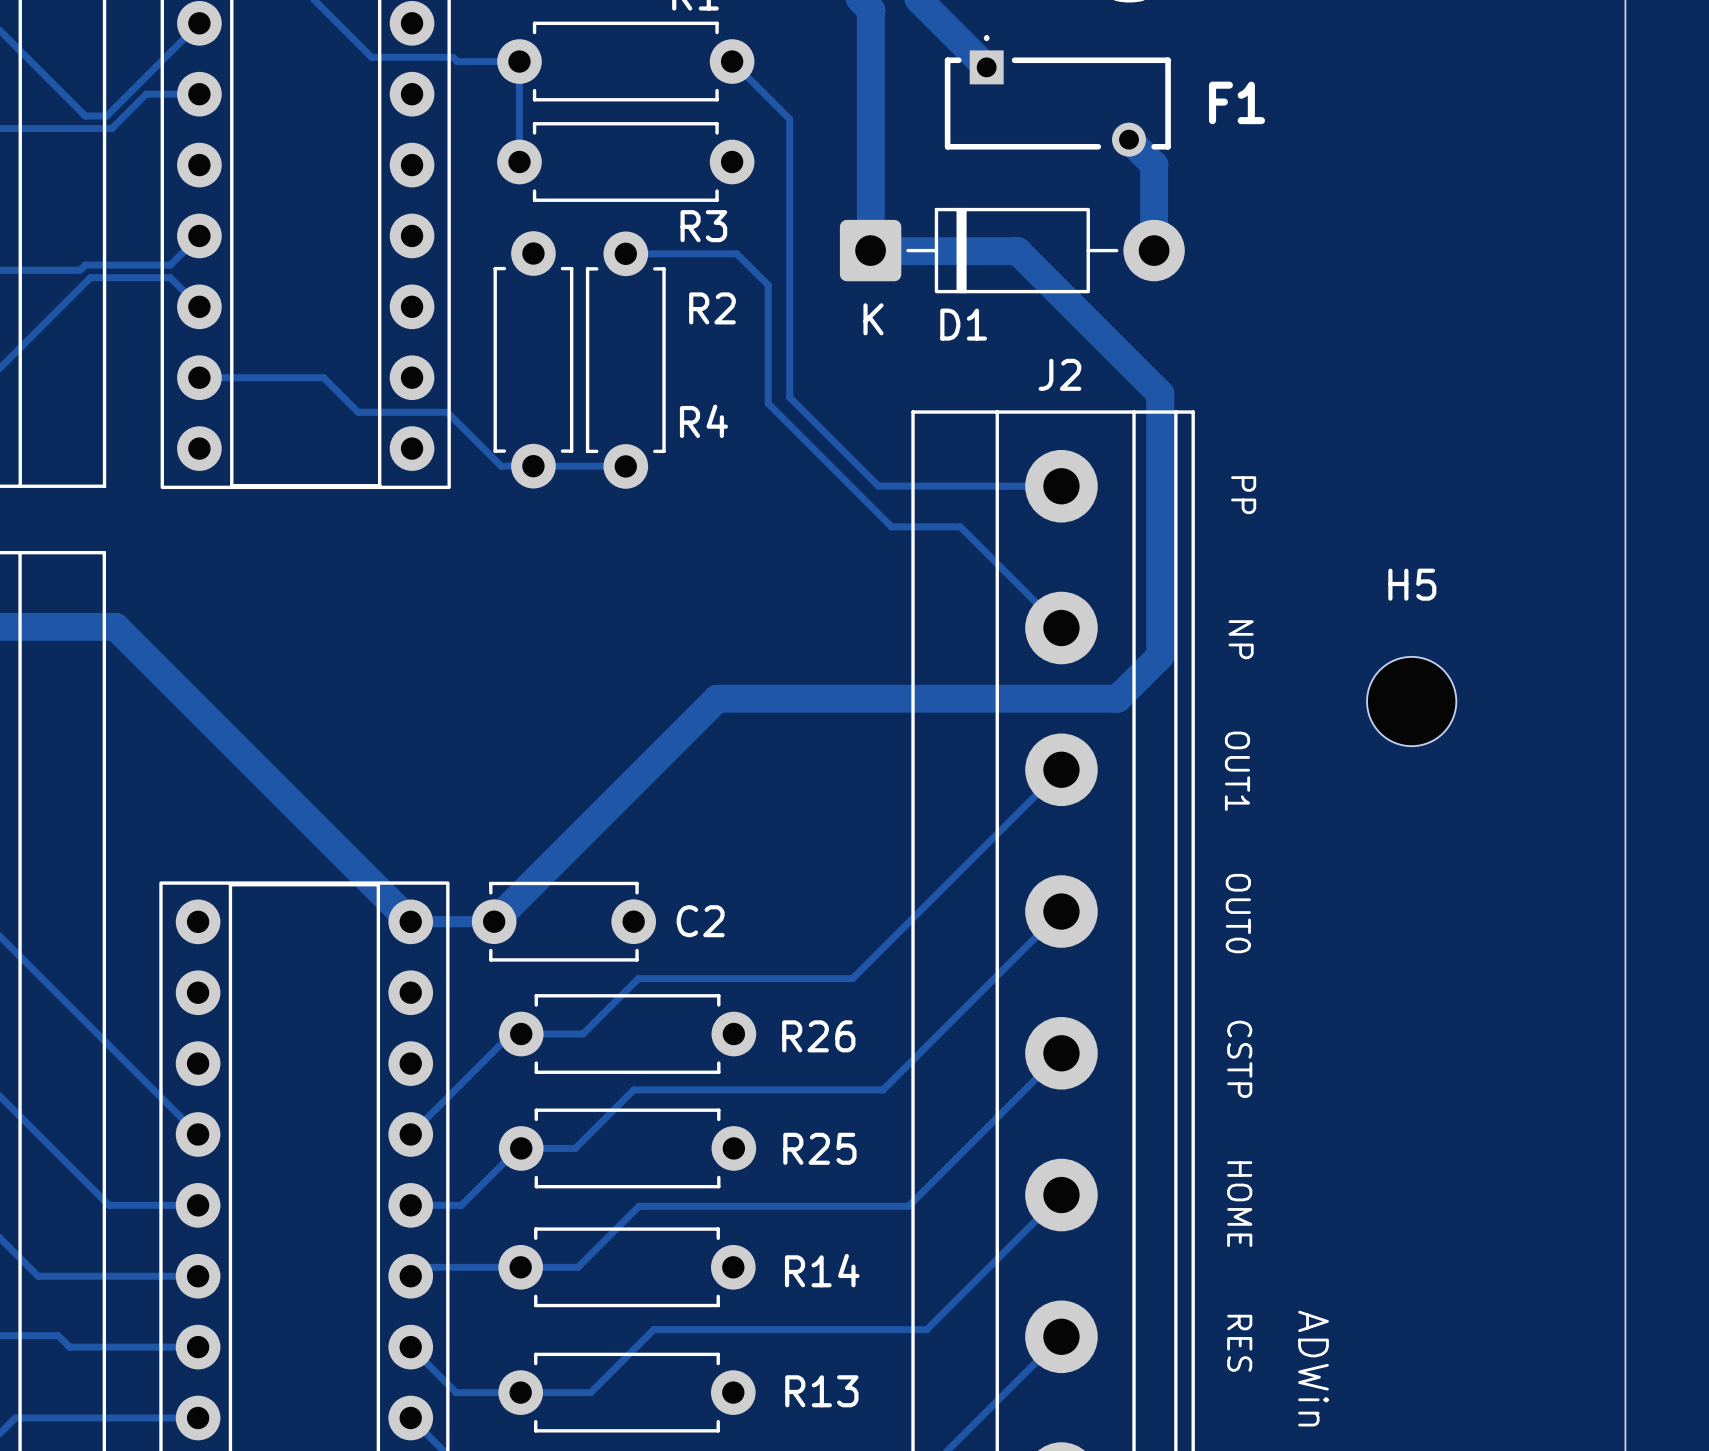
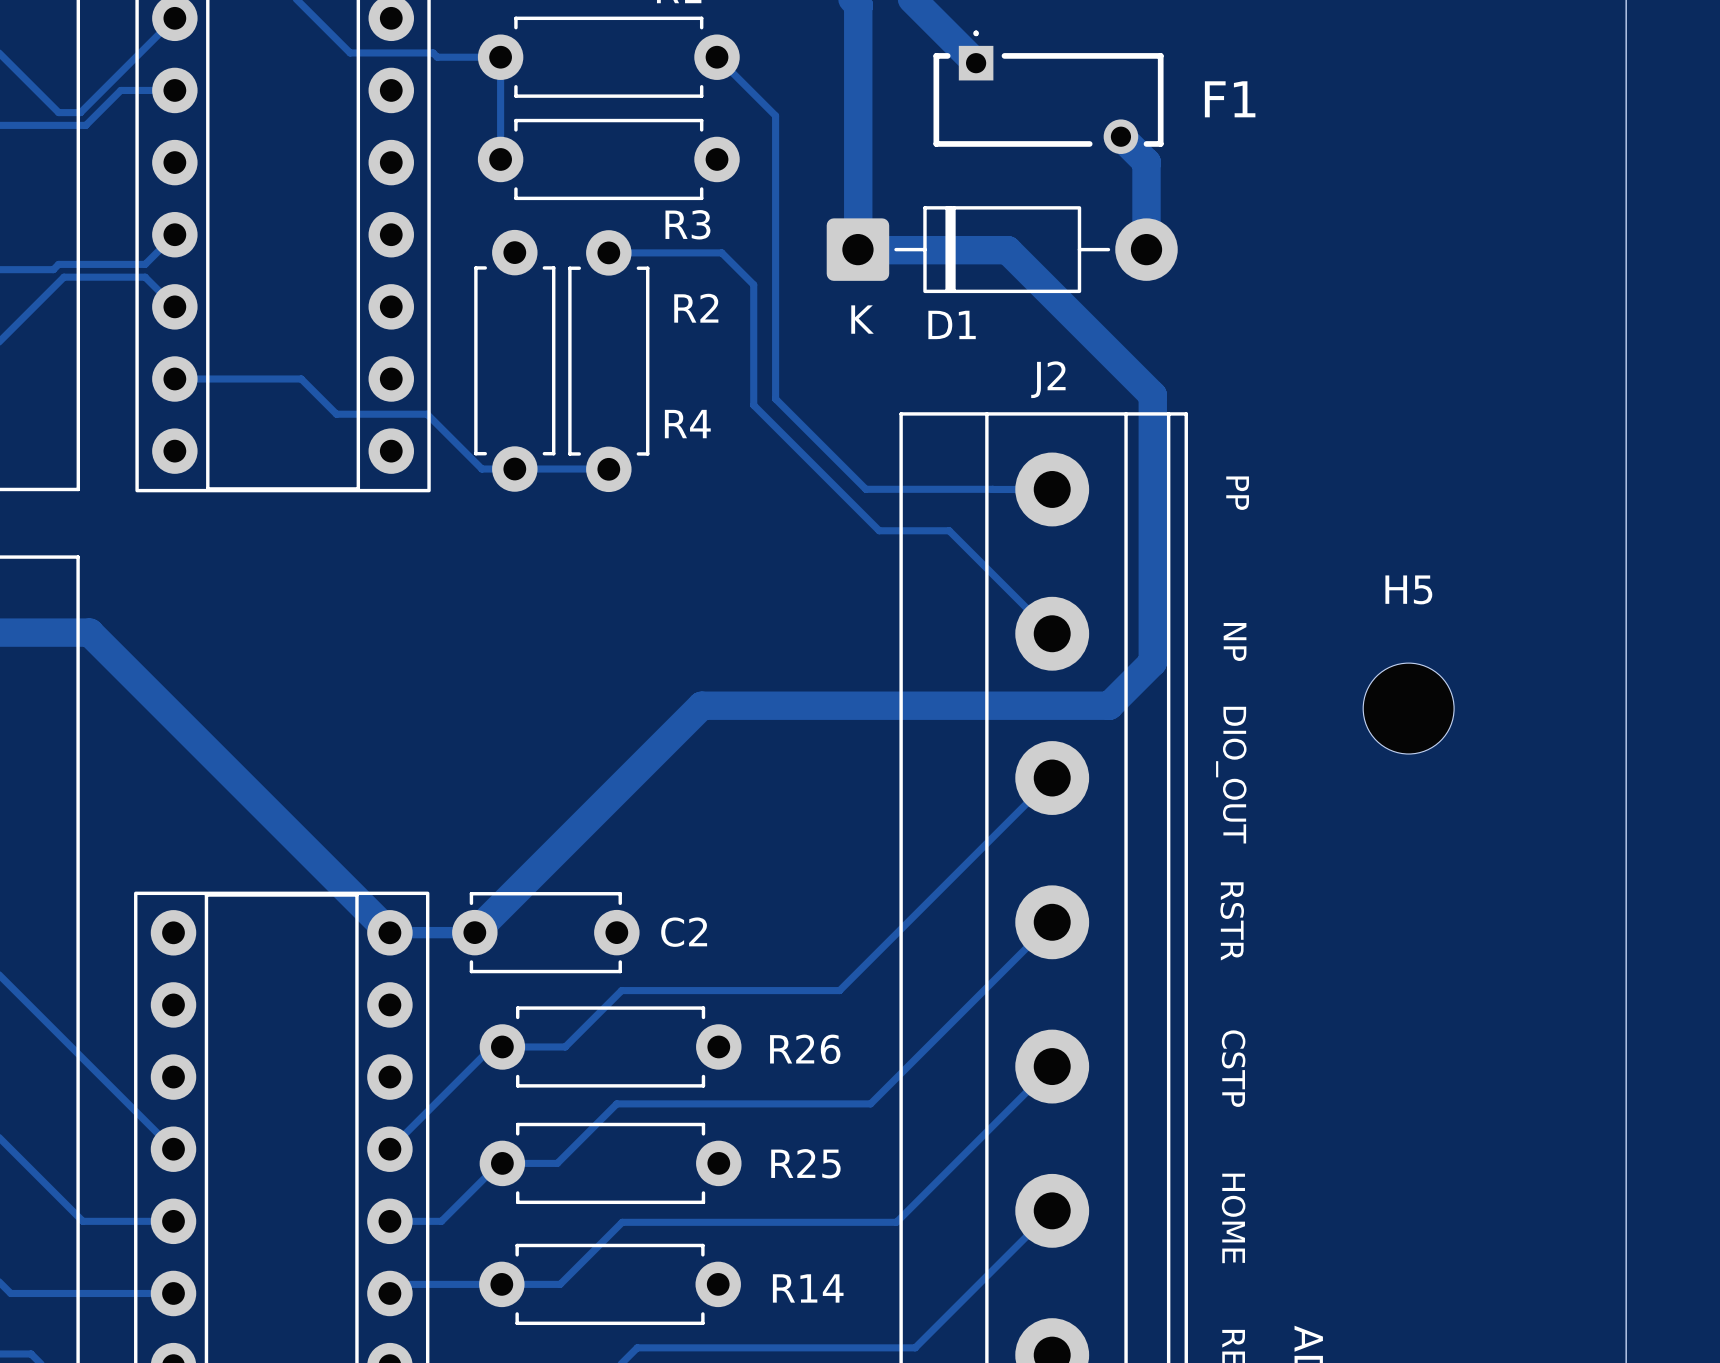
text: none -> DIO_OUT (1231, 775)
text: OUT1 (1237, 771) -> none
text: OUT0 (1238, 913) -> RSTR (1232, 921)

